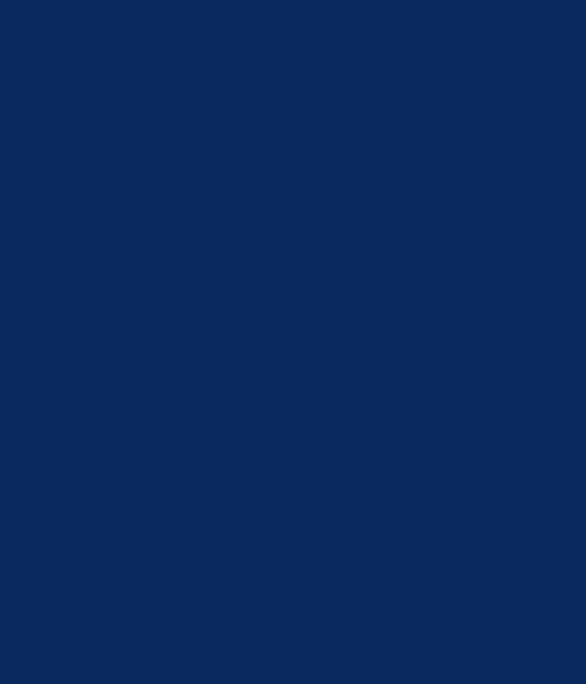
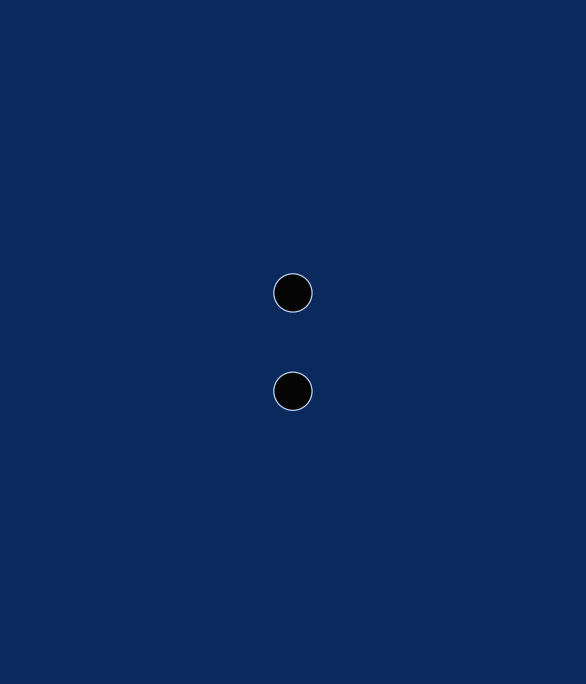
part: none -> (292, 342)

